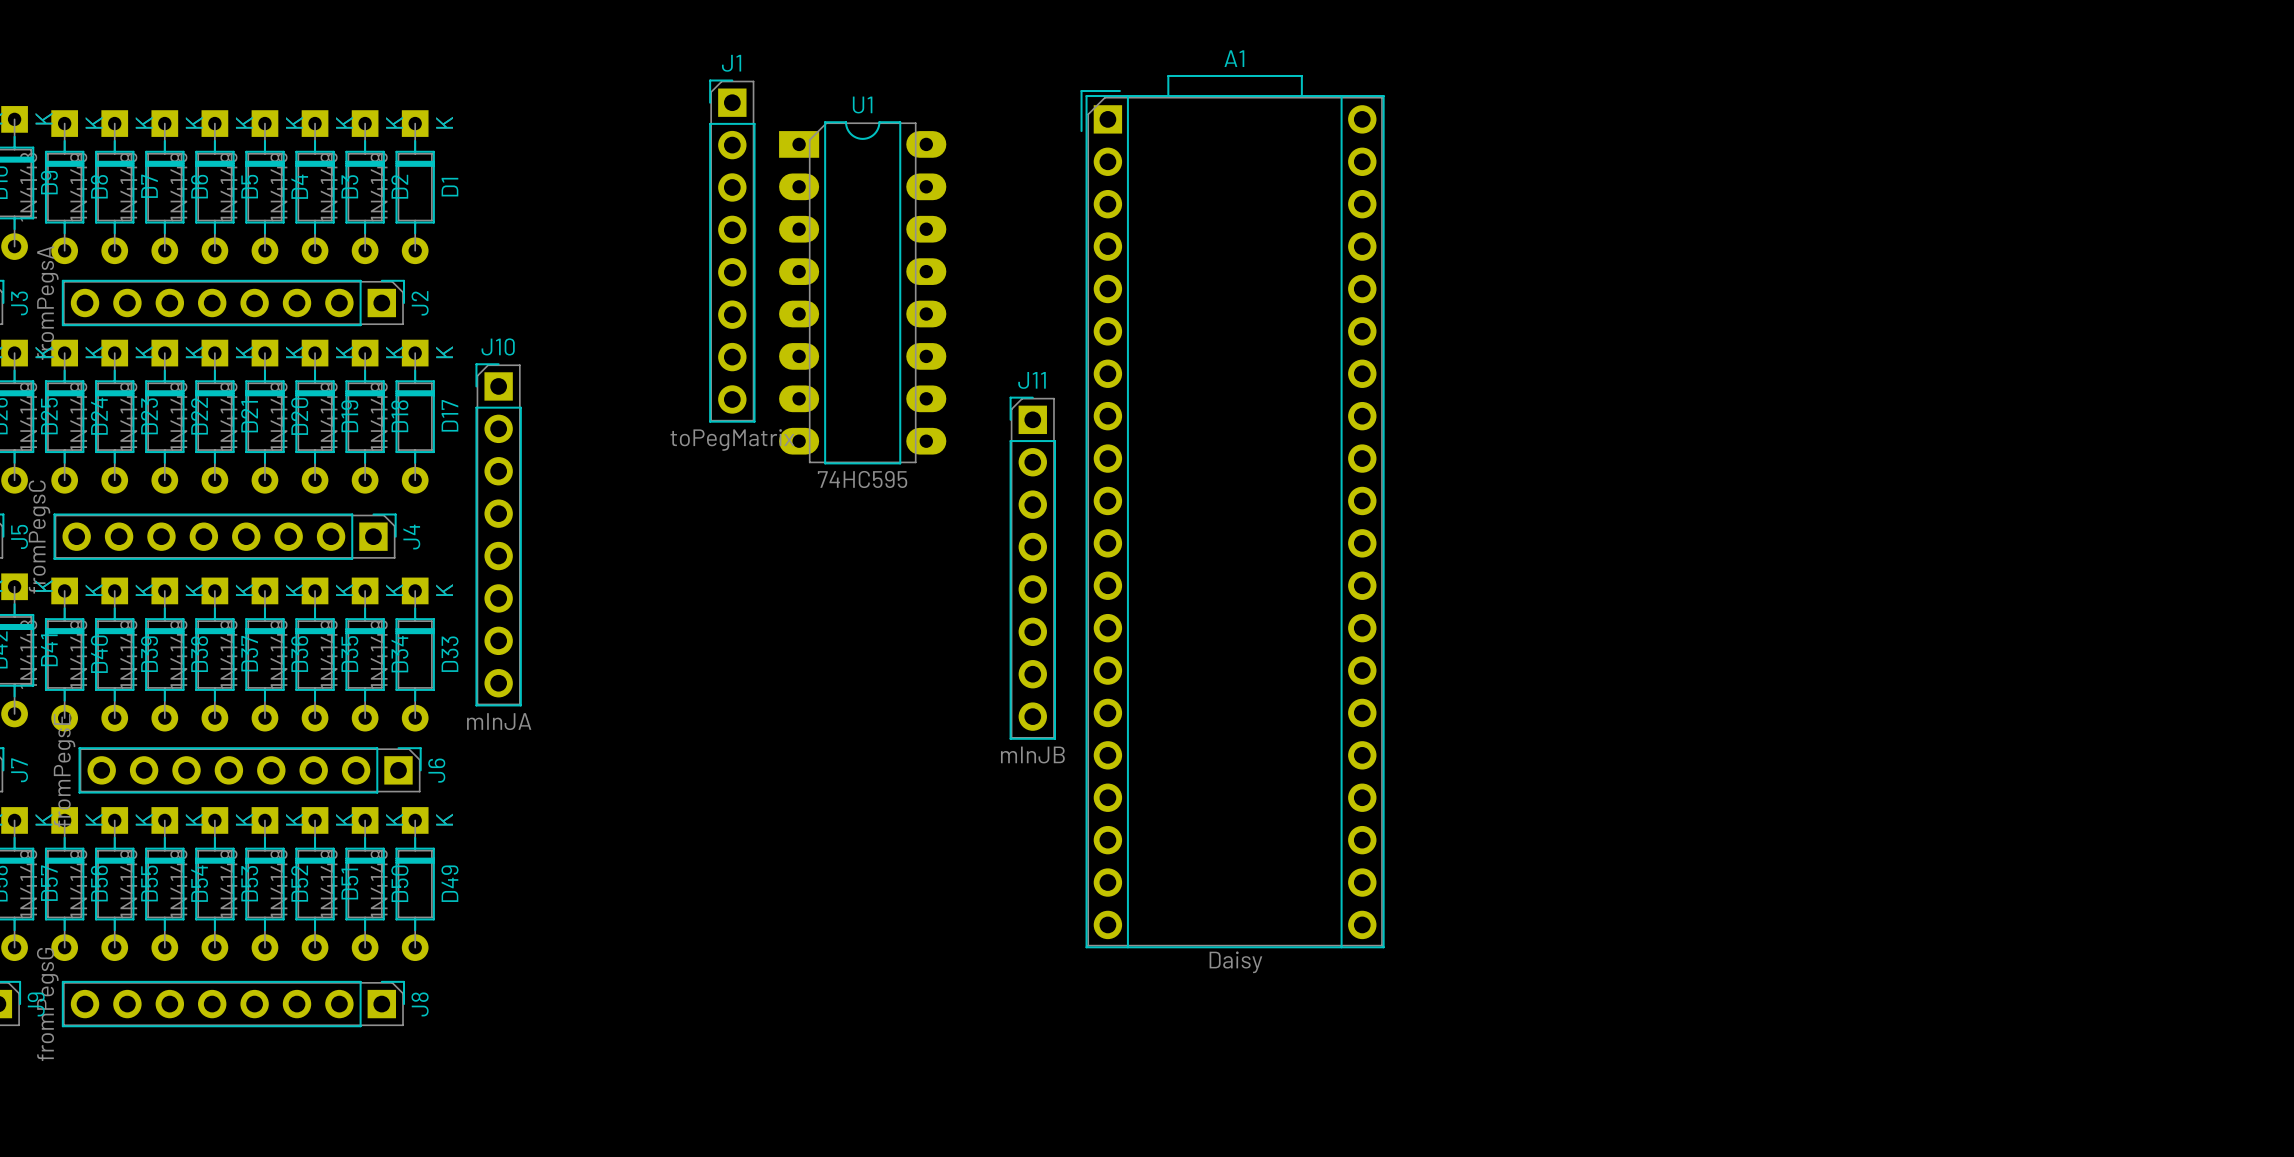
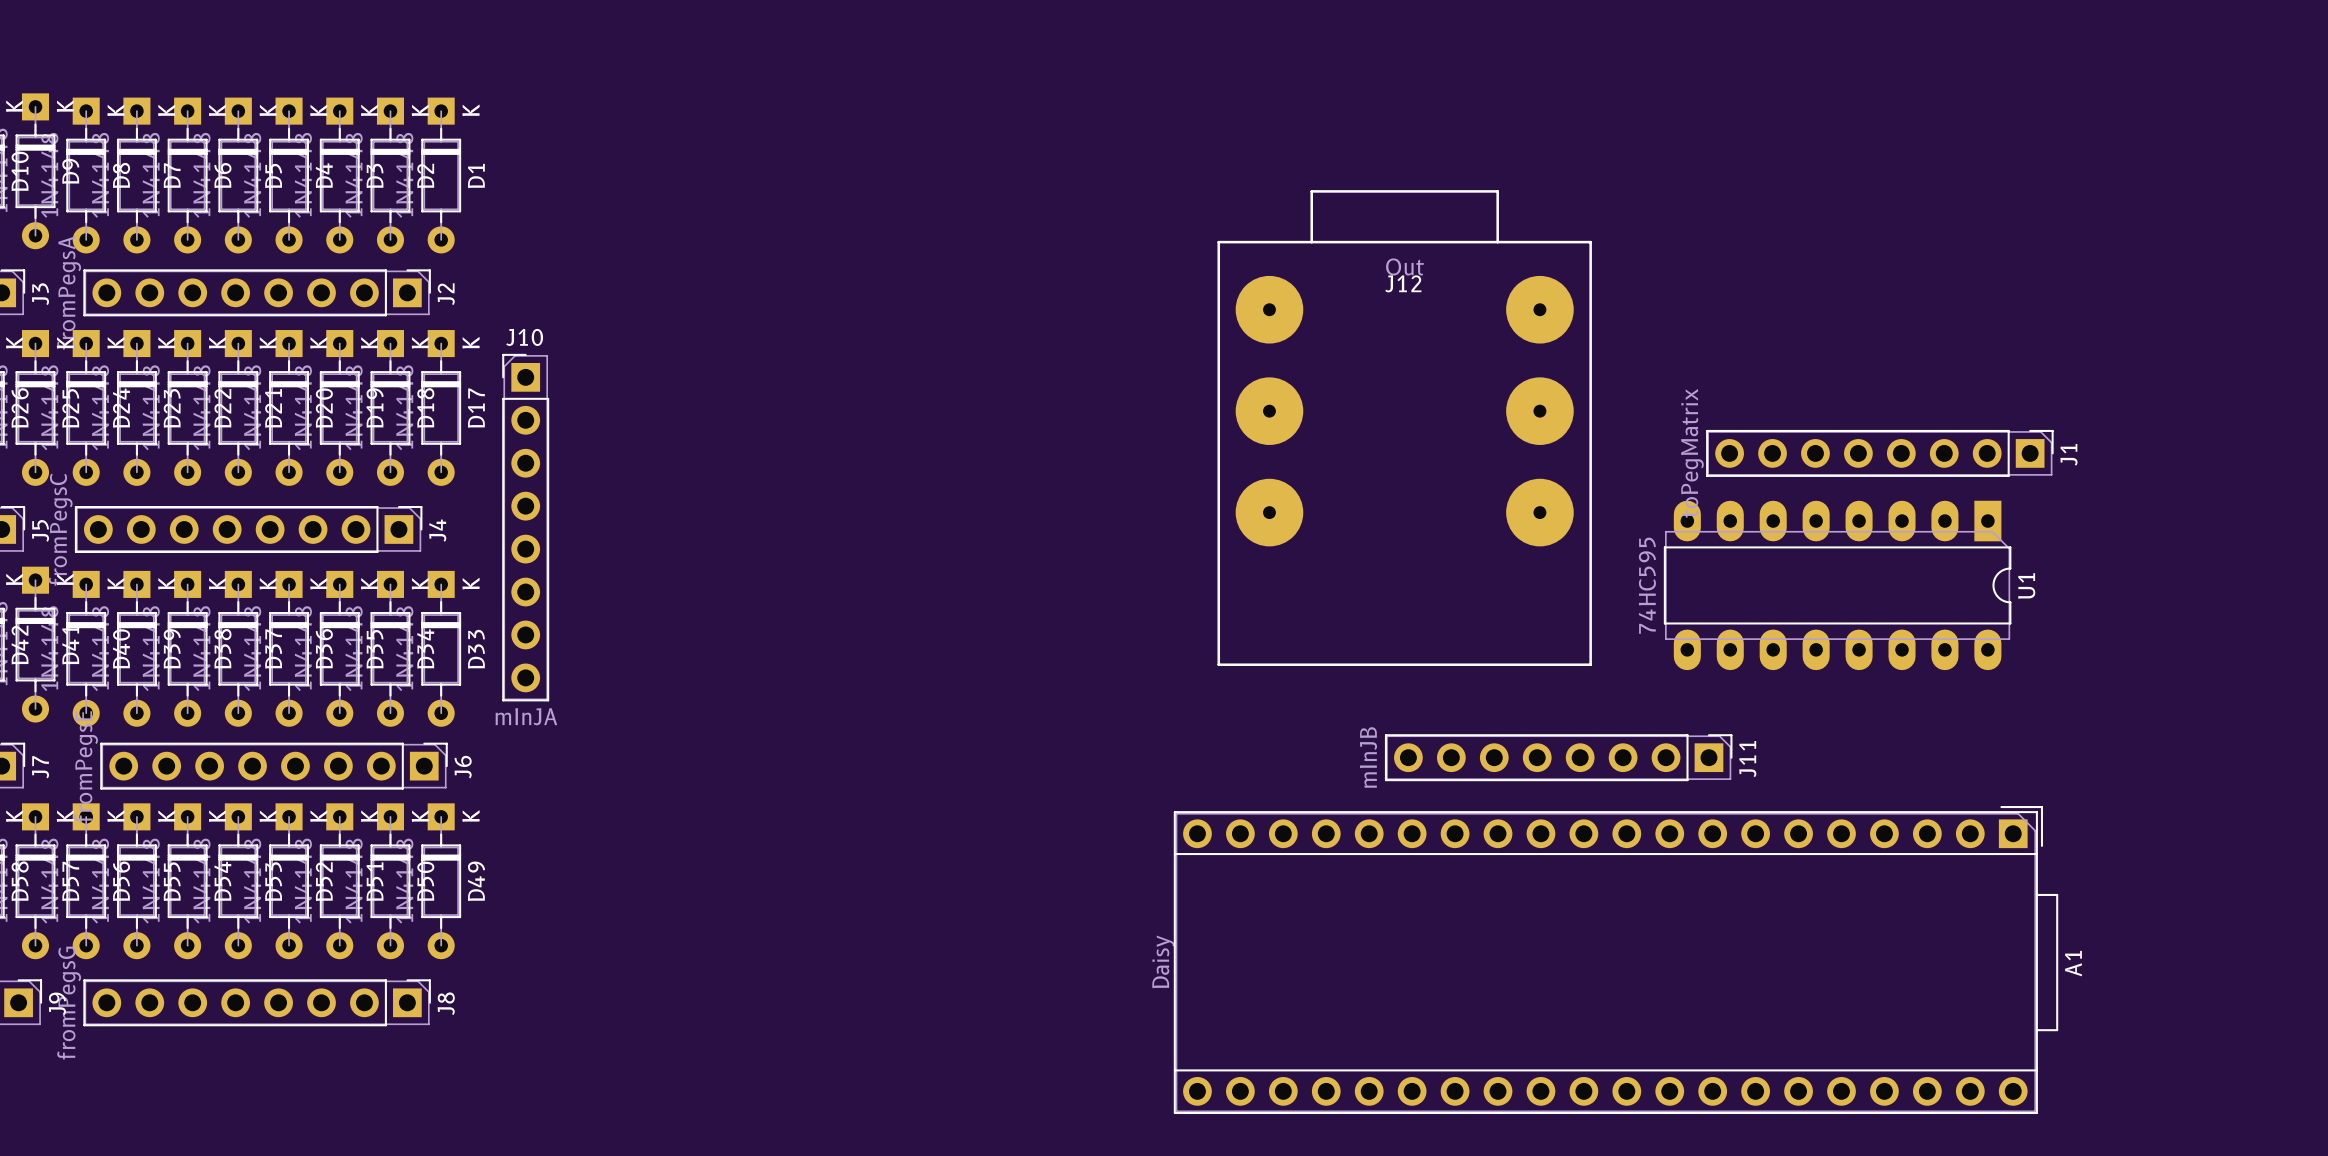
J1 rotation: 0° (732, 251) -> 90° clockwise (1879, 453)
J1 position: (732, 251) -> (1879, 453)
U1 rotation: 0° (862, 292) -> 90° clockwise (1837, 585)
U1 position: (862, 292) -> (1837, 585)
J12: none -> Out (1404, 428)
A1 rotation: 0° (1232, 511) -> 90° clockwise (1616, 960)
A1 position: (1232, 511) -> (1616, 960)
J11 rotation: 0° (1032, 568) -> 90° clockwise (1558, 757)
J11 position: (1032, 568) -> (1558, 757)

